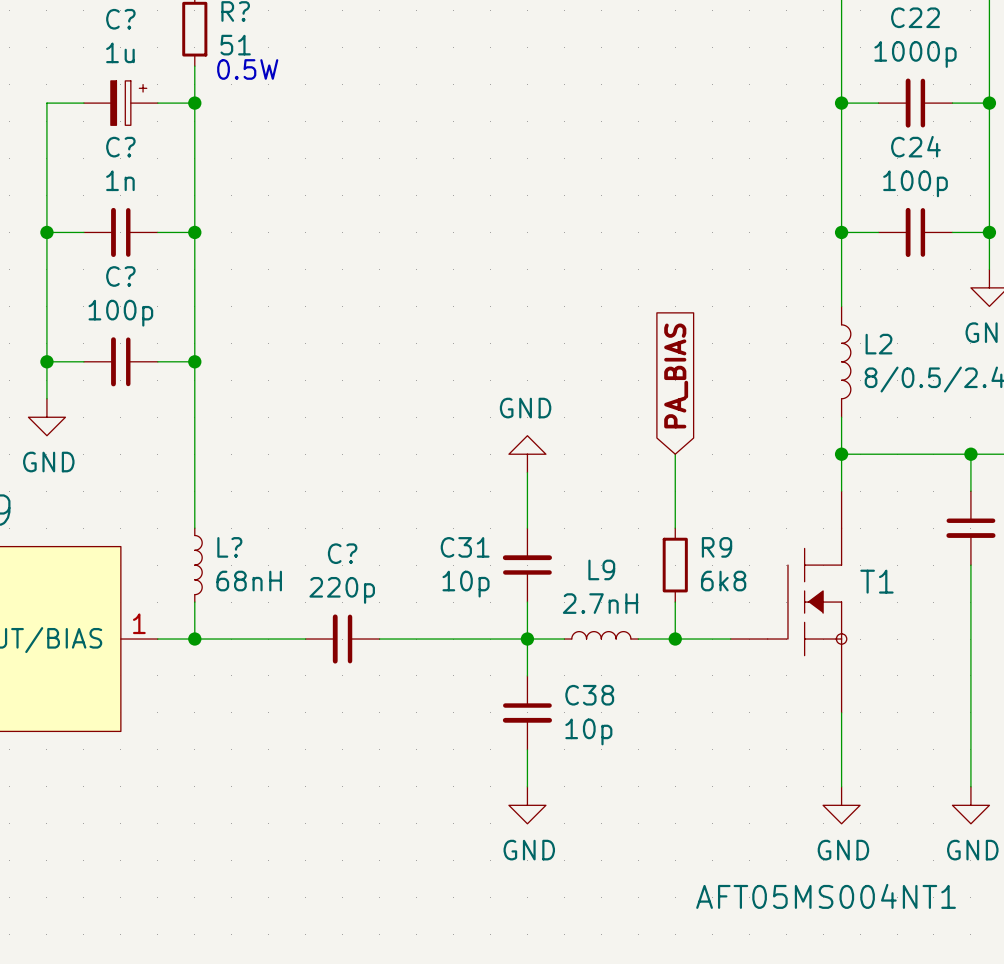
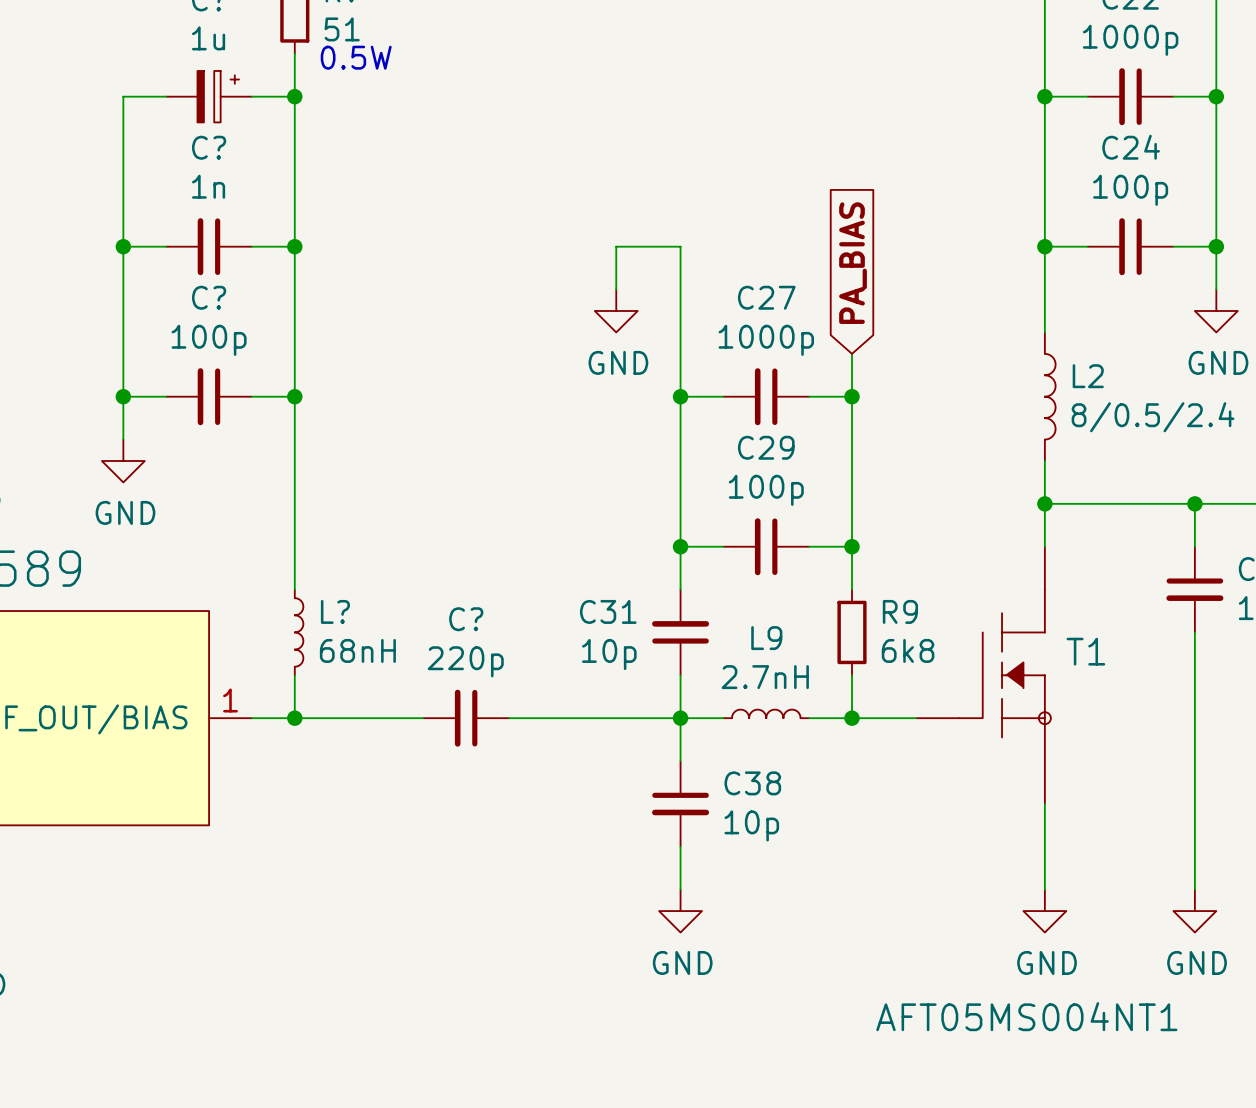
wire: none -> (616, 289) (616, 246) (680, 246) (680, 525)
wire: none -> (852, 353) (852, 503)
wire: none -> (680, 396) (723, 396)
junction: none -> (680, 396)
C27: none -> 1000p (766, 396)
wire: none -> (809, 396) (852, 396)
junction: none -> (852, 396)
global label position: PA_BIAS (676, 375) -> PA_BIAS (853, 263)
power symbol rotation: 0° (527, 454) -> 180° (616, 310)
power symbol position: GND (527, 454) -> GND (616, 310)
wire: none -> (680, 546) (723, 546)
junction: none -> (680, 546)
C29: none -> 100p (766, 546)
wire: none -> (809, 546) (852, 546)
junction: none -> (852, 546)

